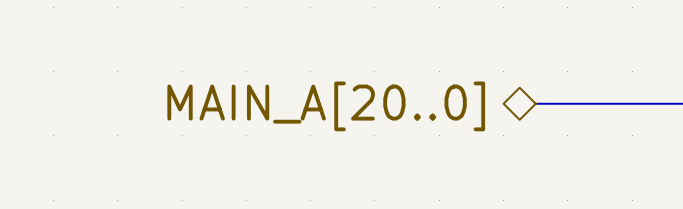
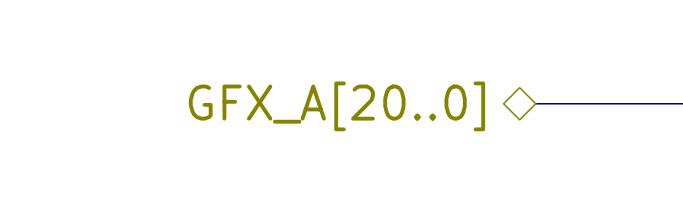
hierarchical label: MAIN_A[20..0] (326, 106) -> GFX_A[20..0] (336, 106)

